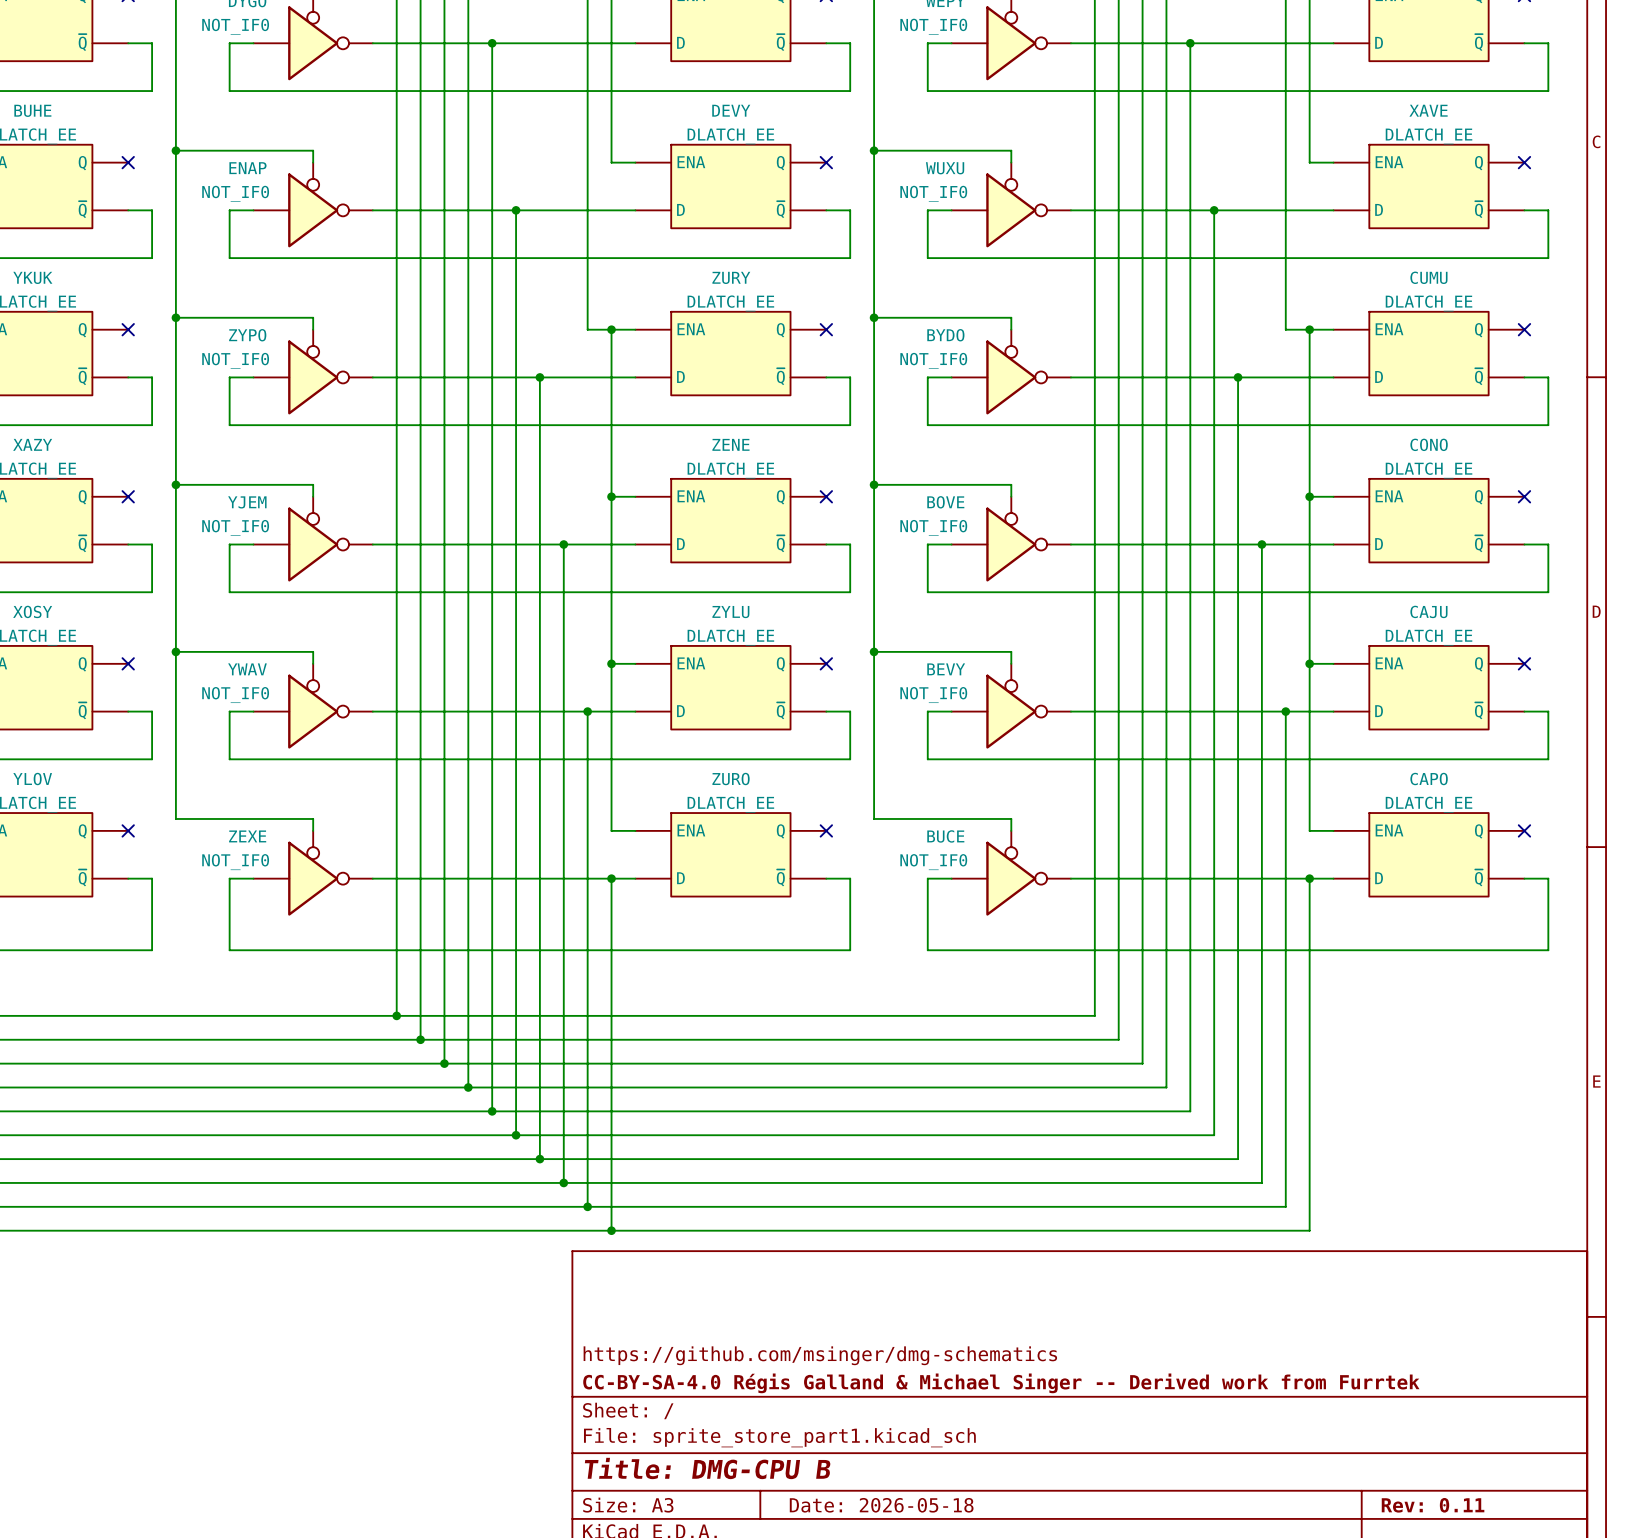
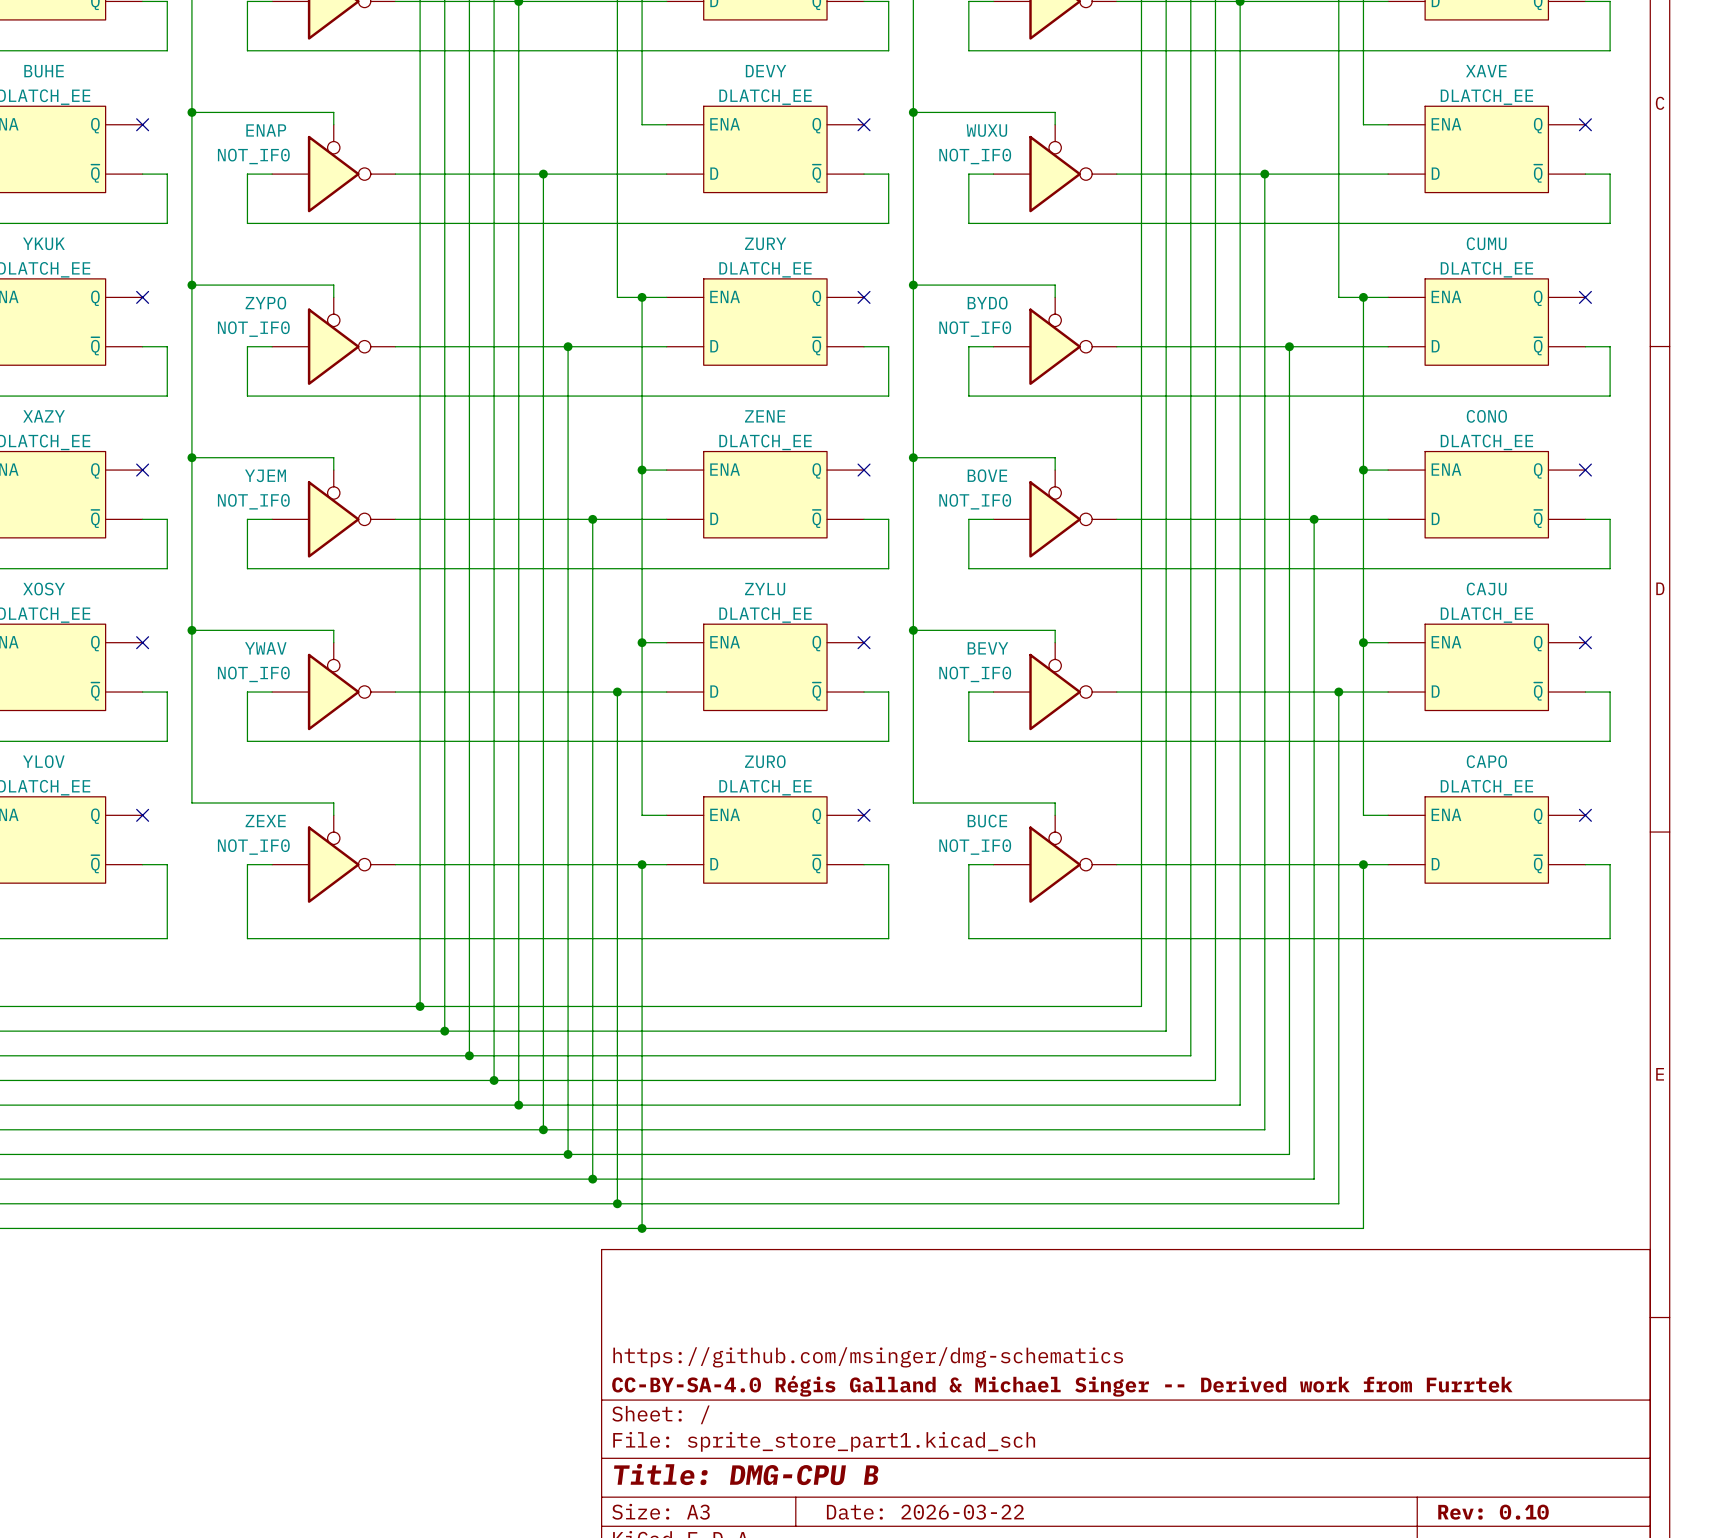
title block: Date: 2026-05-18 (881, 1505) -> Date: 2026-03-22 (925, 1512)
title block: Rev: 0.11 (1433, 1505) -> Rev: 0.10 (1493, 1512)

